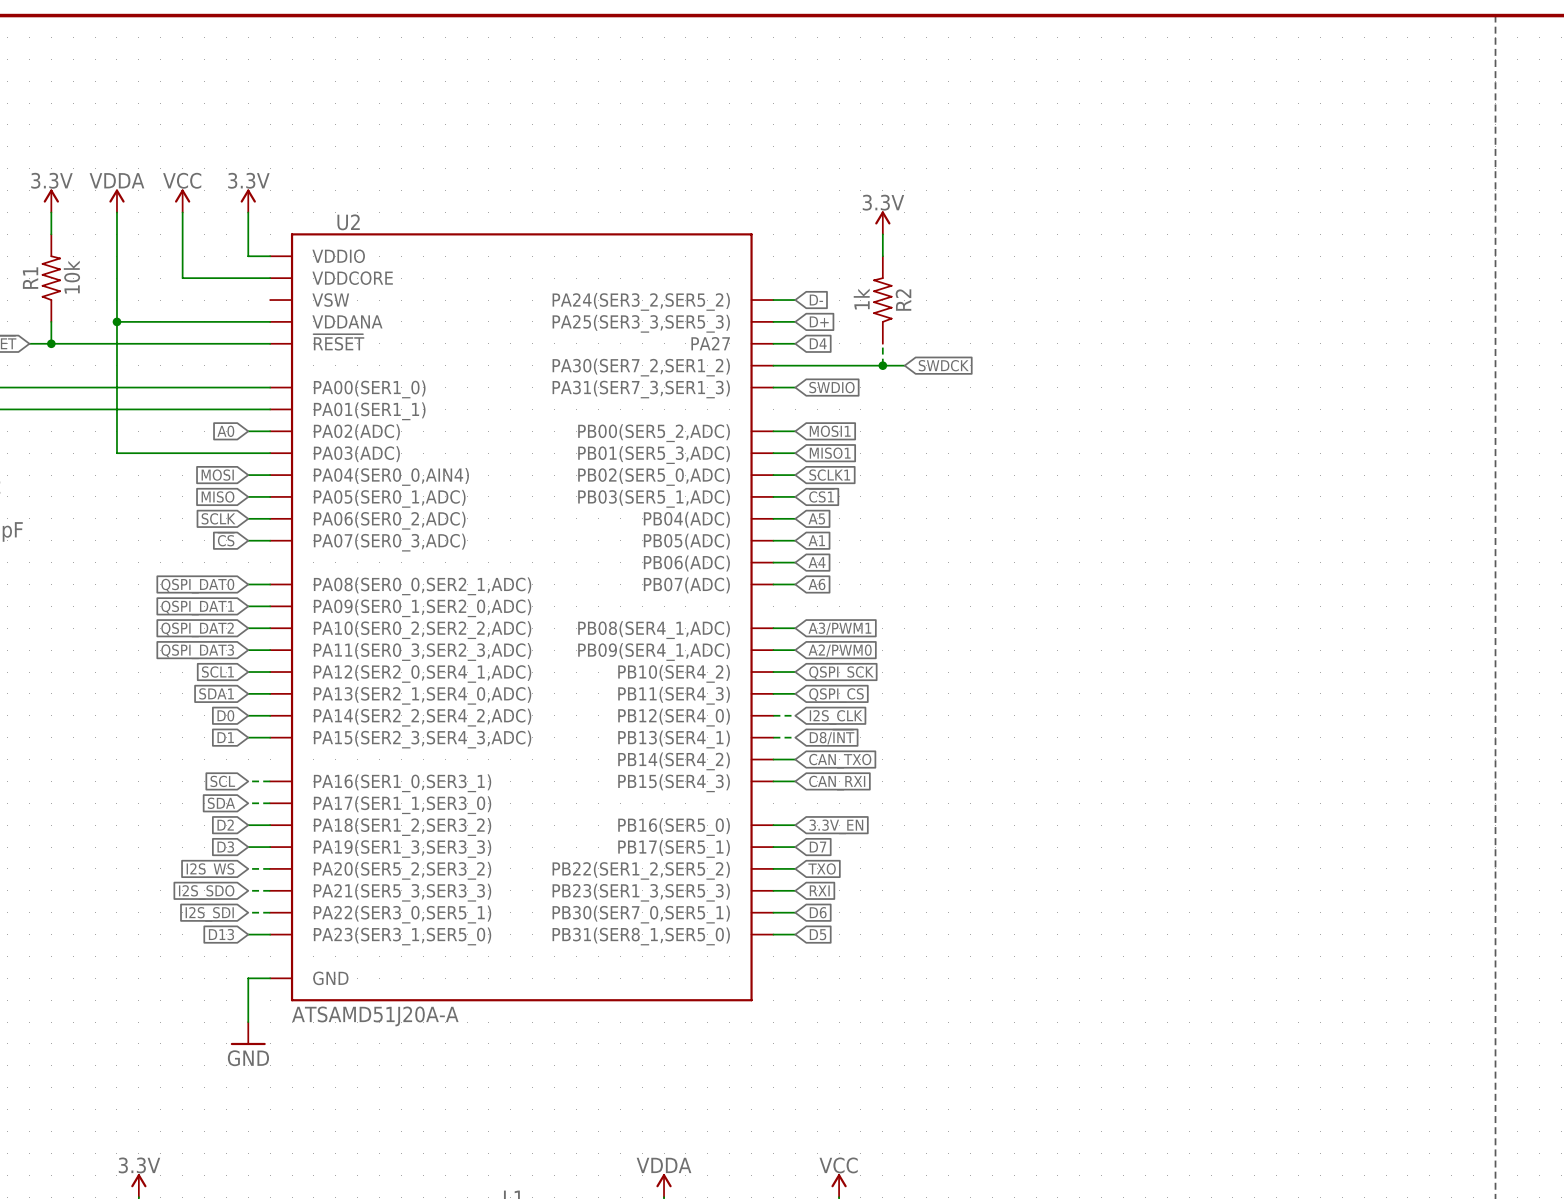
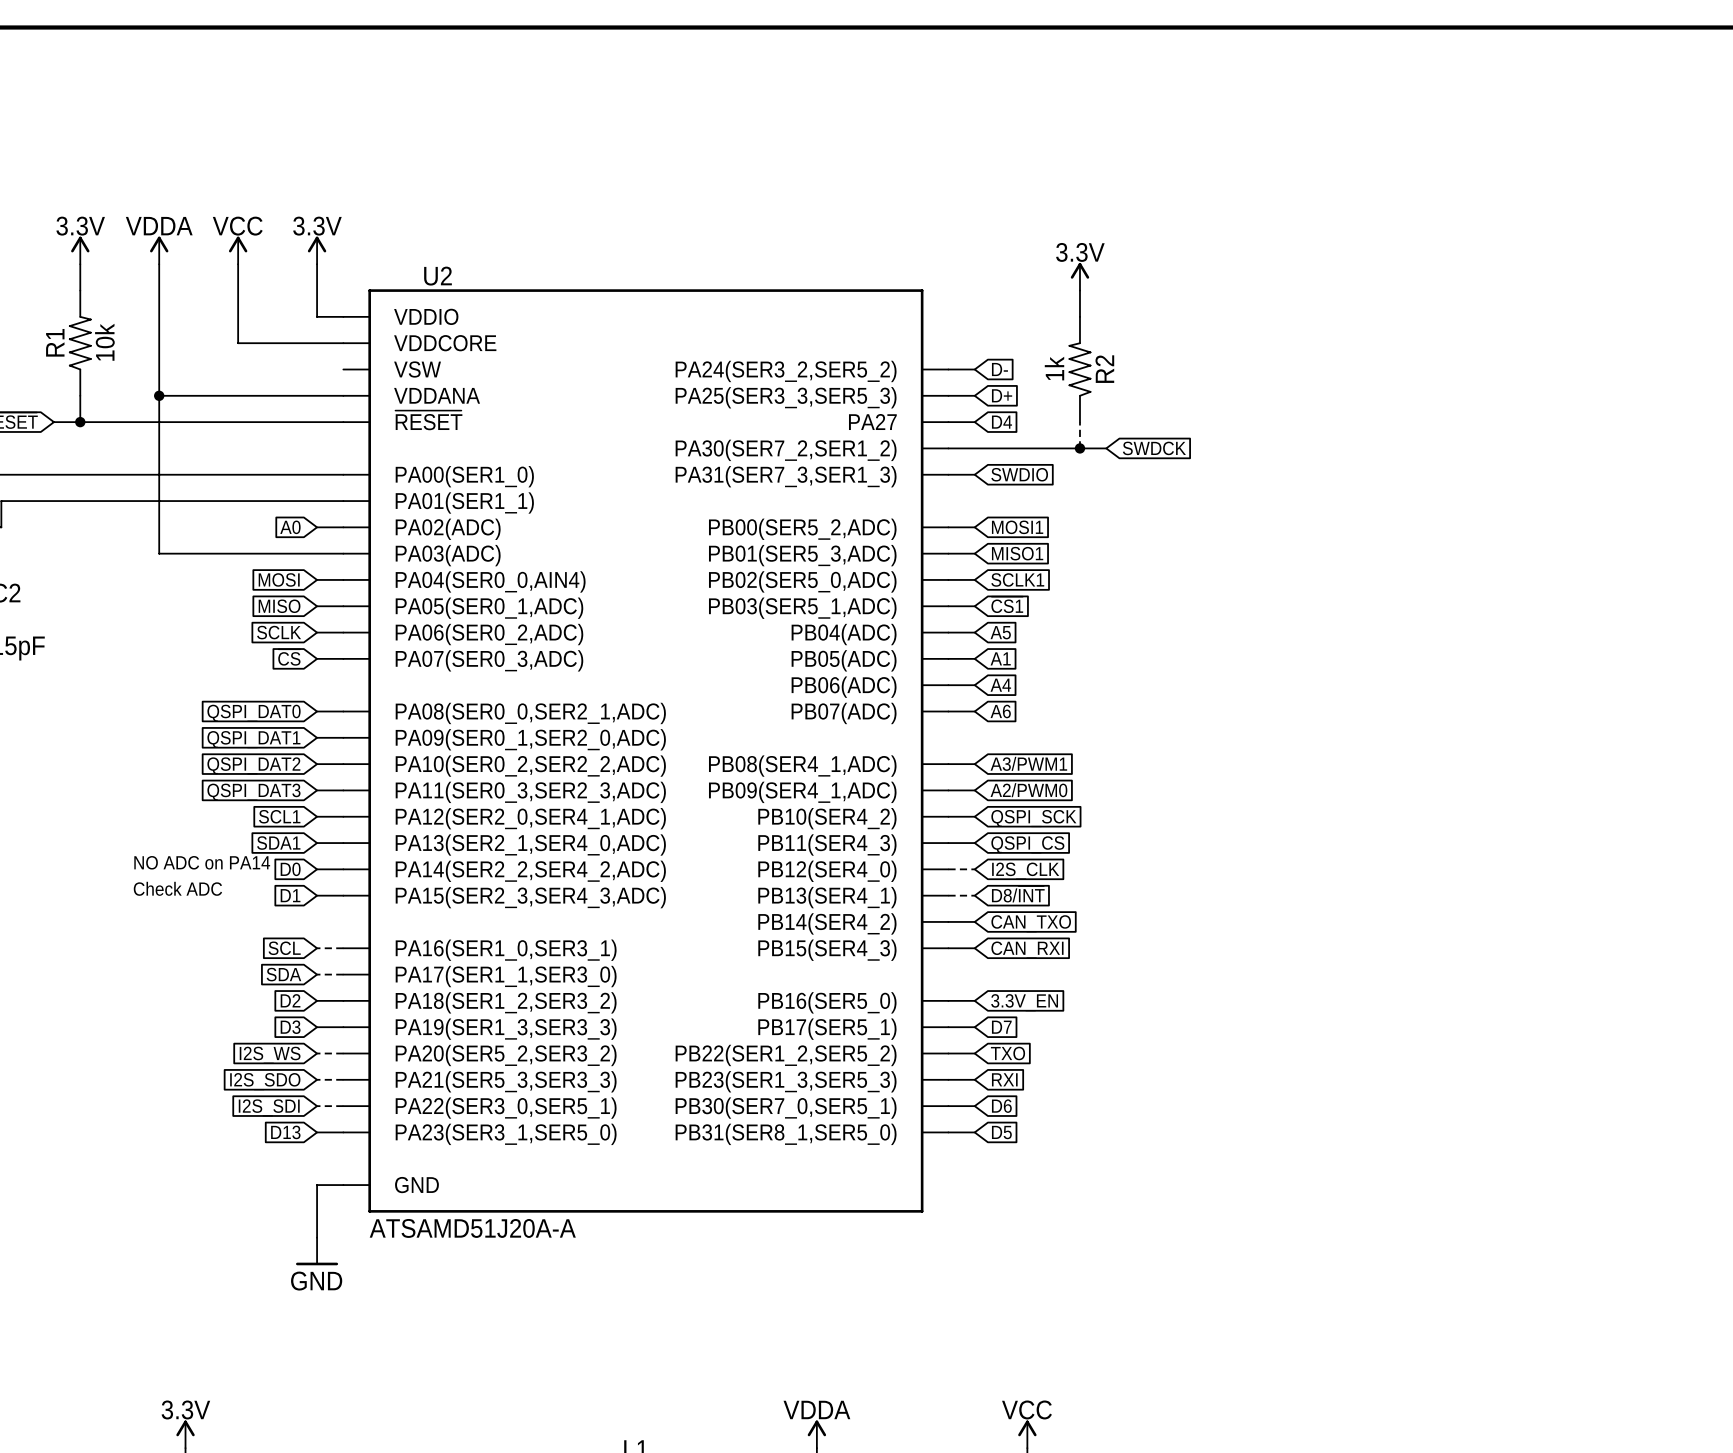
text: none -> NO ADC on PA14 (202, 862)
text: none -> Check ADC (177, 888)

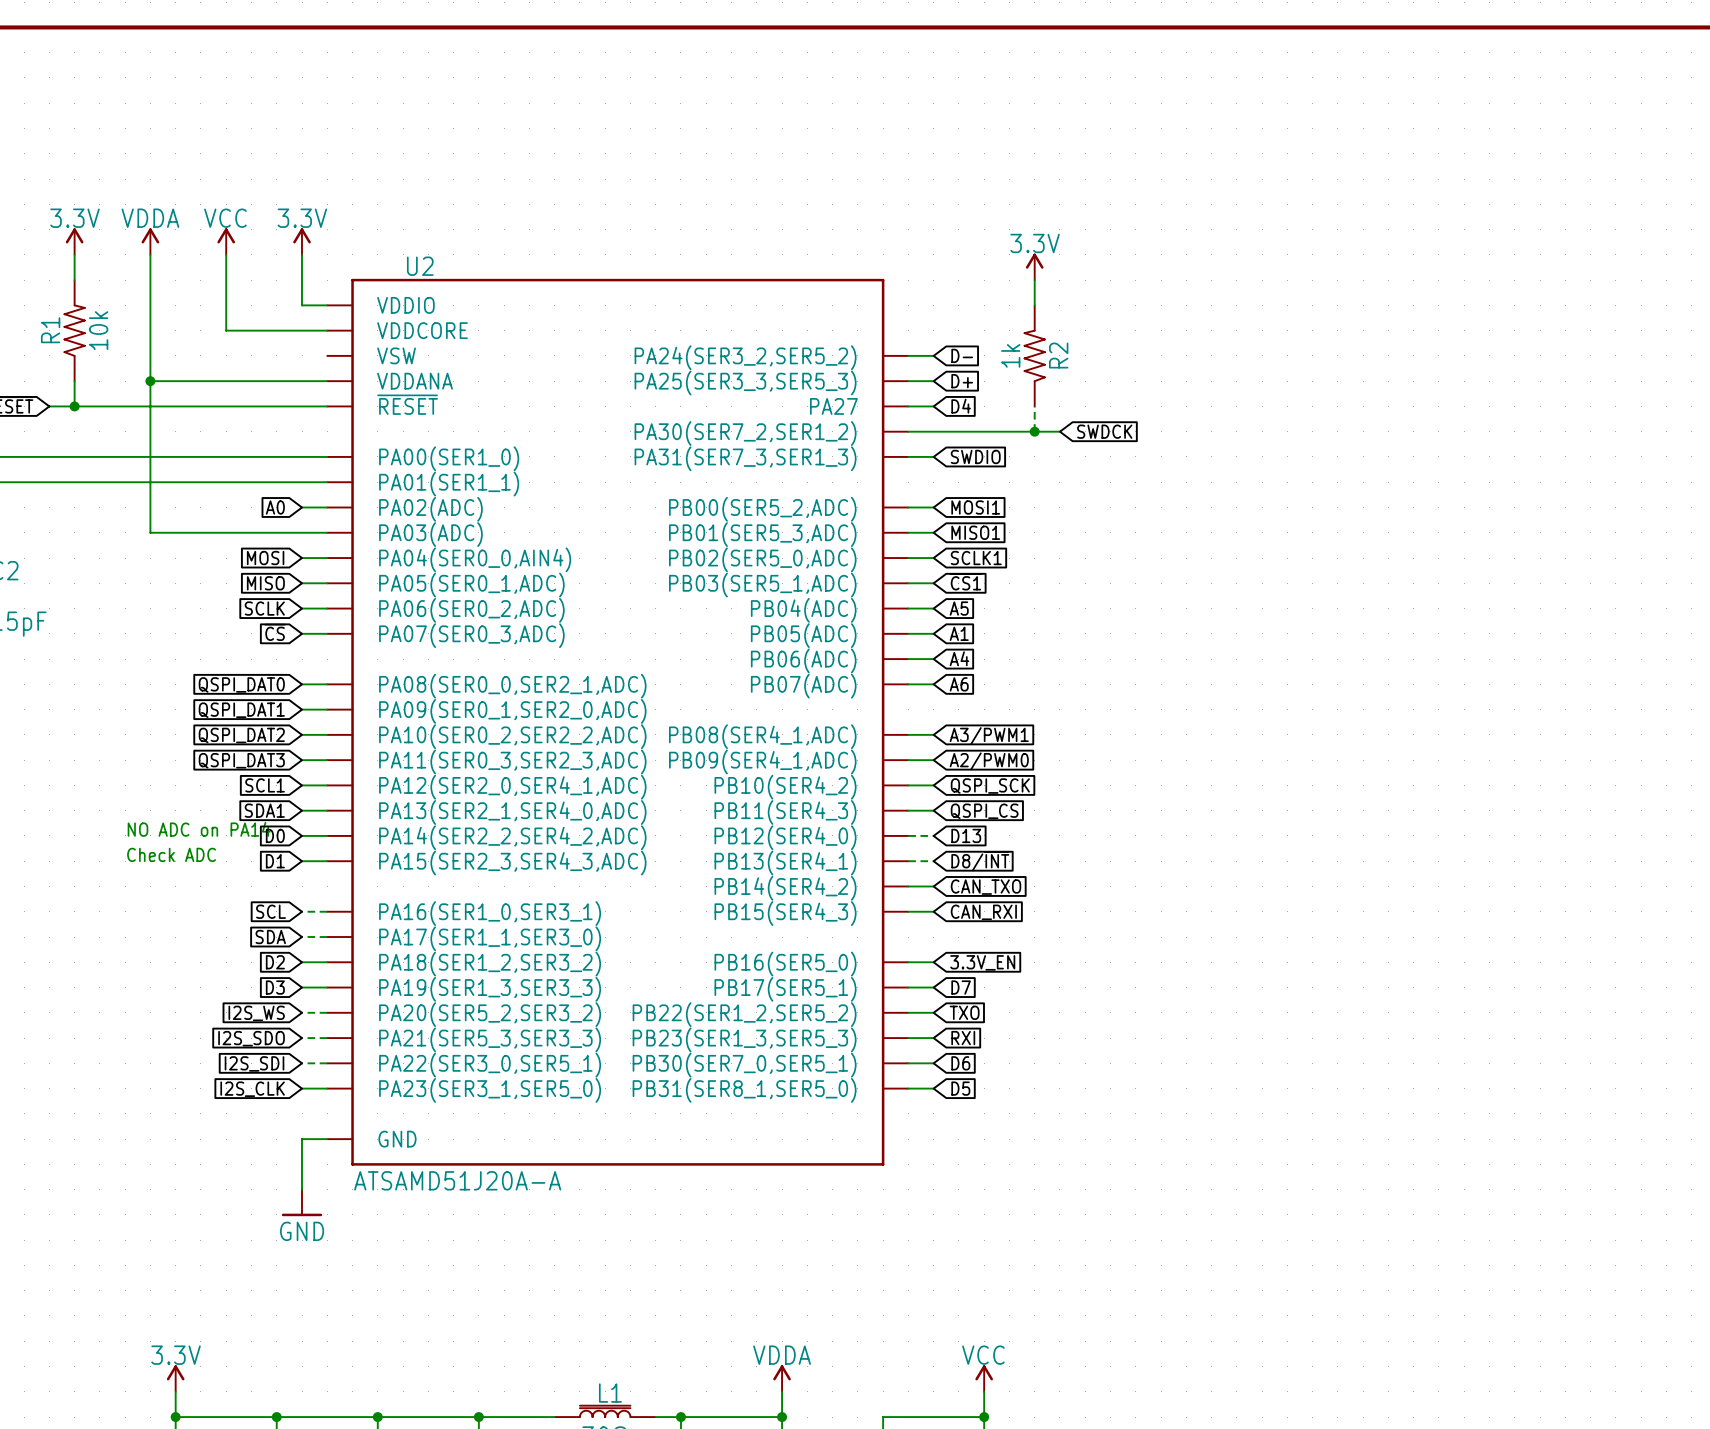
global label: I2S_CLK (1025, 871) -> D13 (966, 835)
global label: D13 (285, 1132) -> I2S_CLK (252, 1089)

